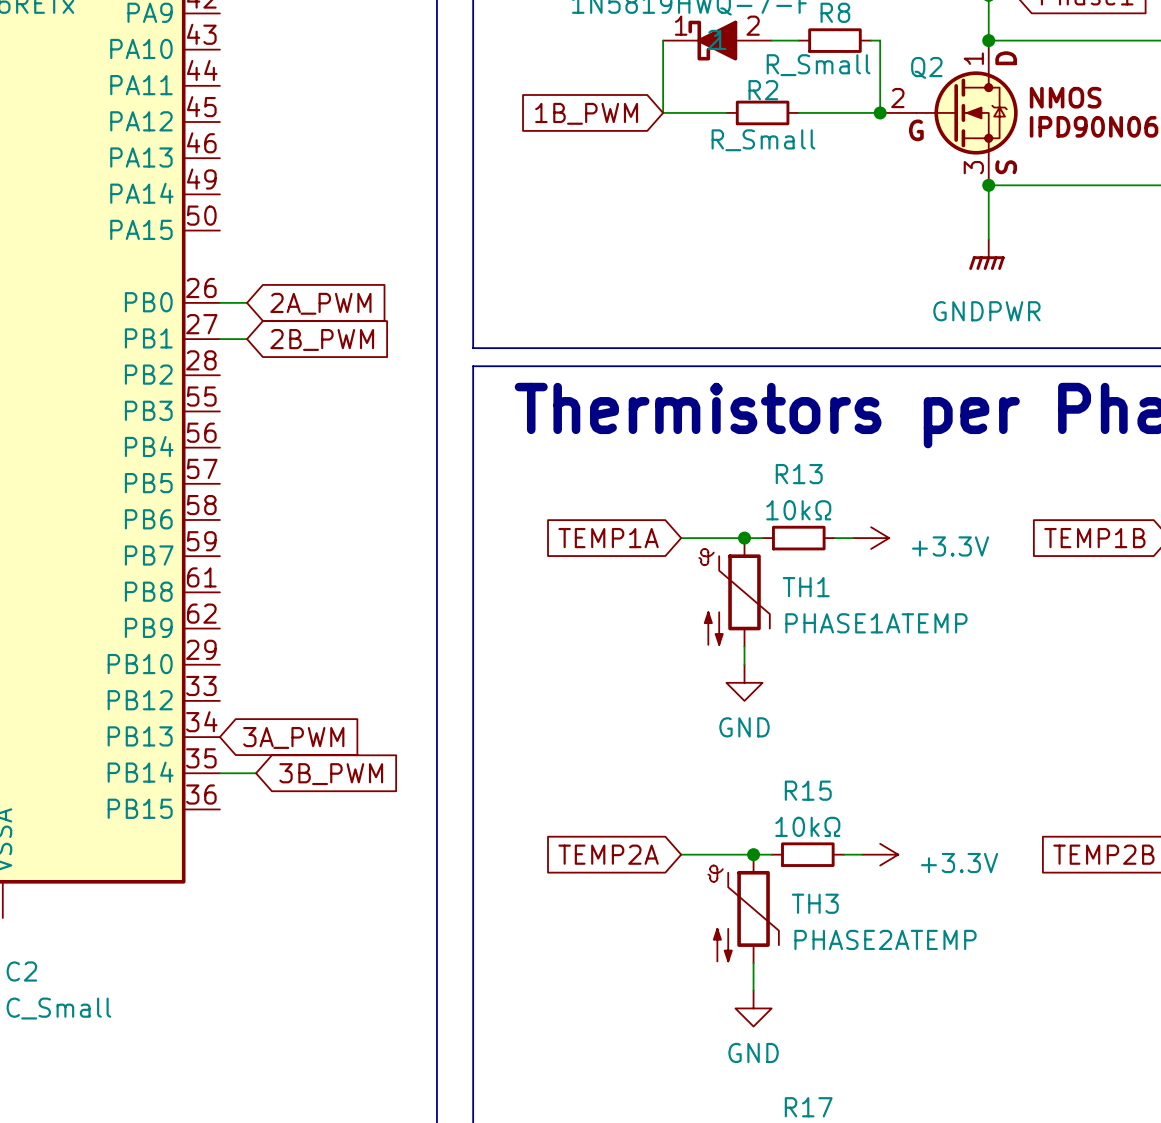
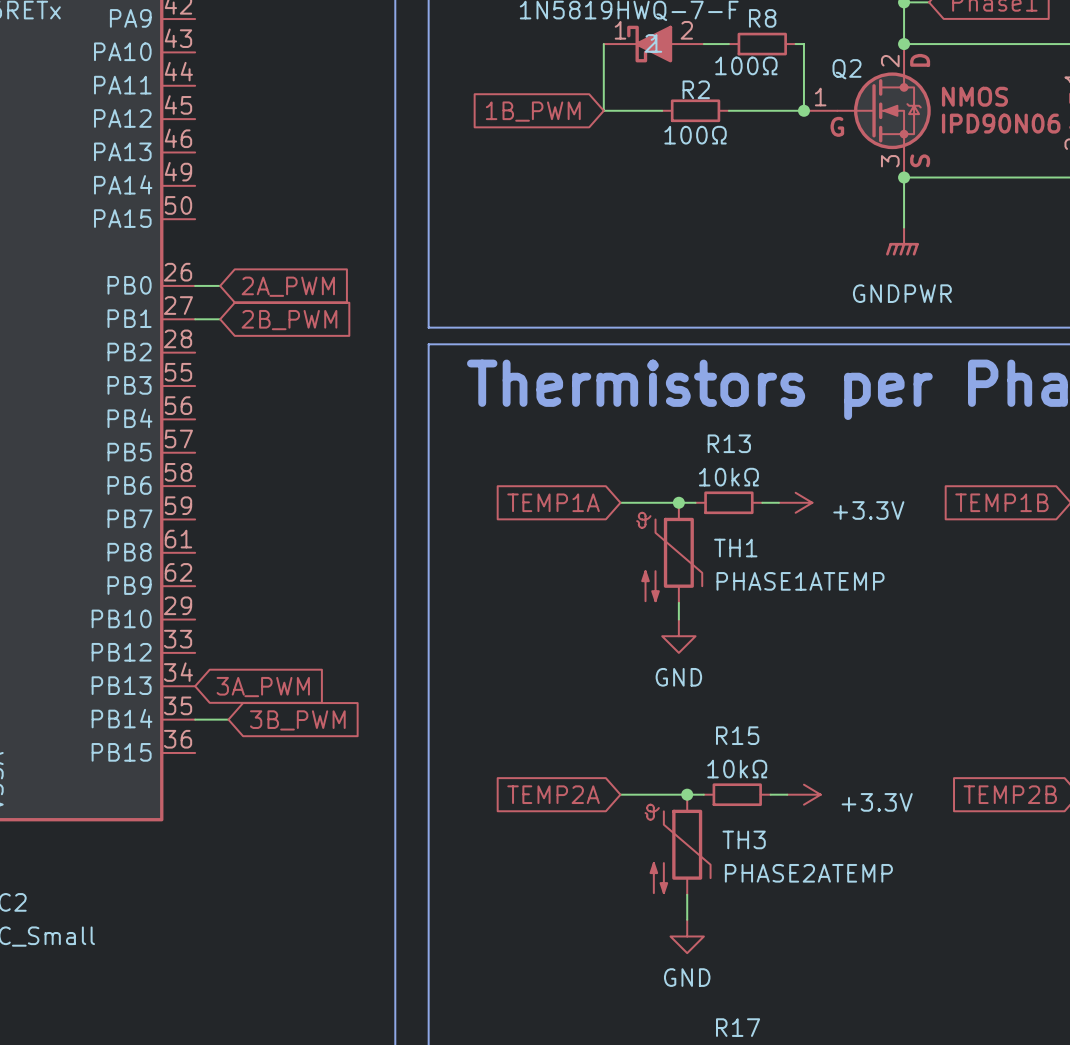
Q2 pin number: 1 (973, 58) -> 2 (890, 61)
R8 value: R_Small (818, 65) -> 100Ω (746, 65)
Q2 pin number: 2 (897, 98) -> 1 (820, 97)
R2 value: R_Small (763, 140) -> 100Ω (695, 135)

